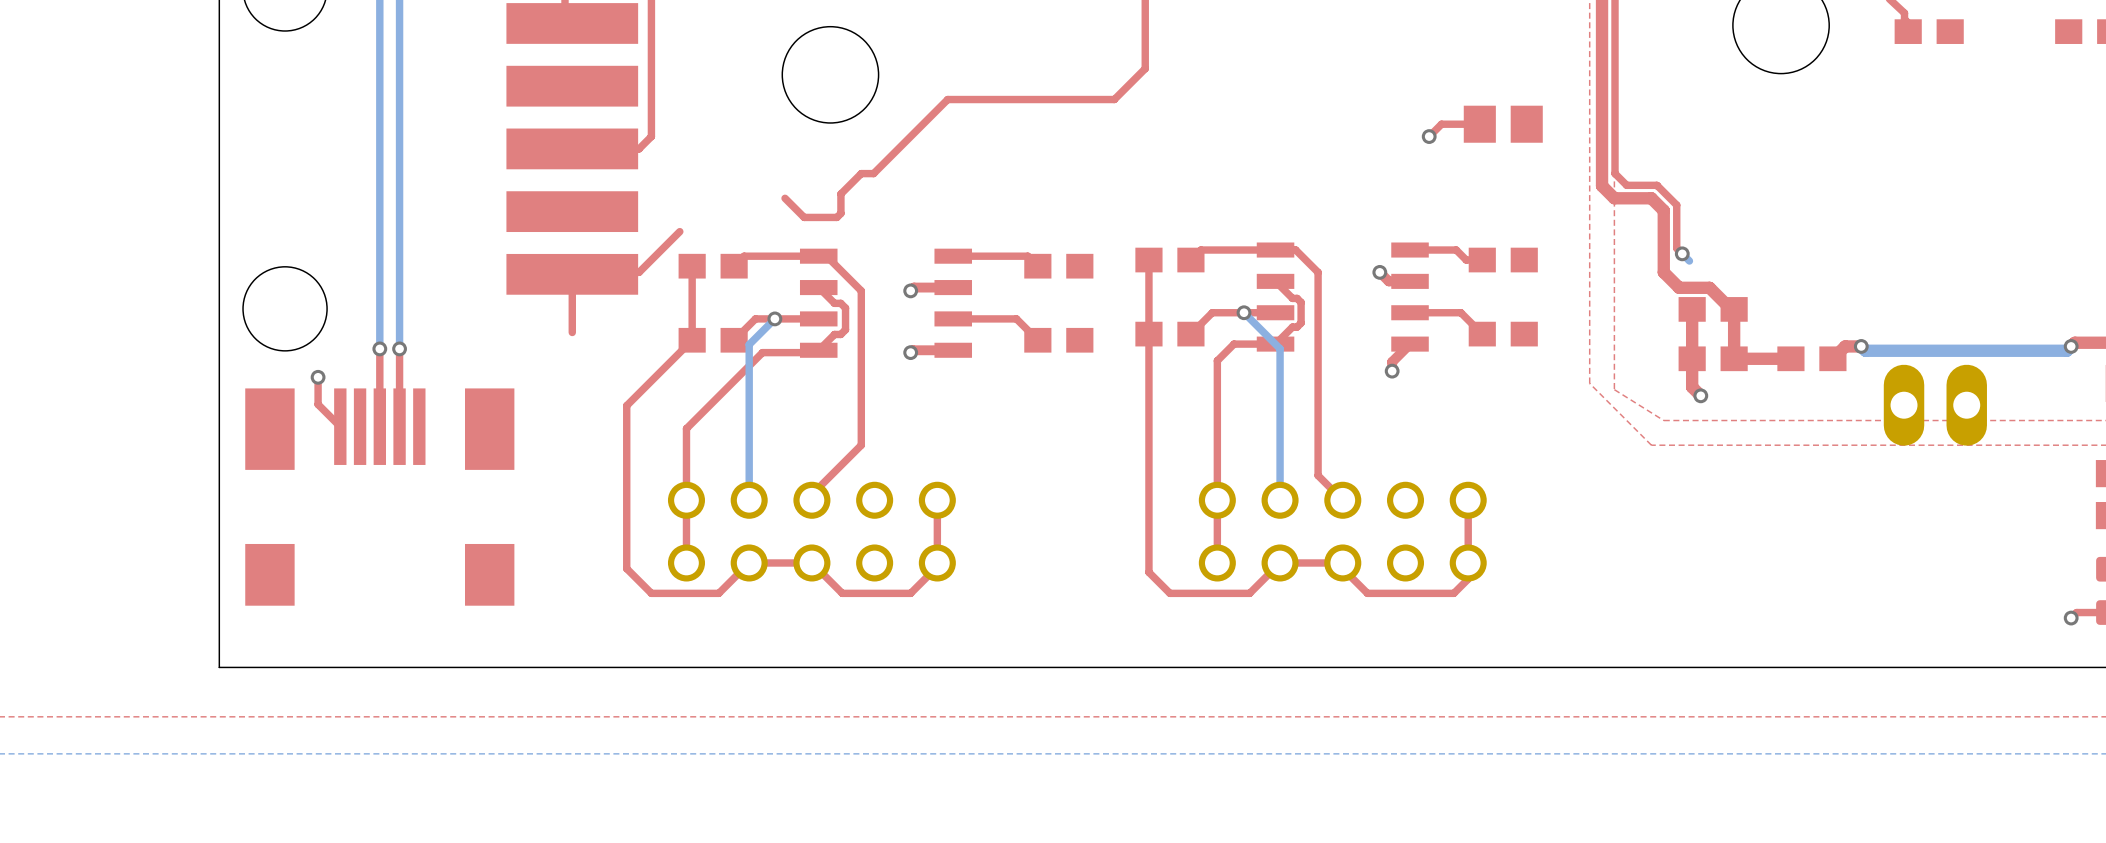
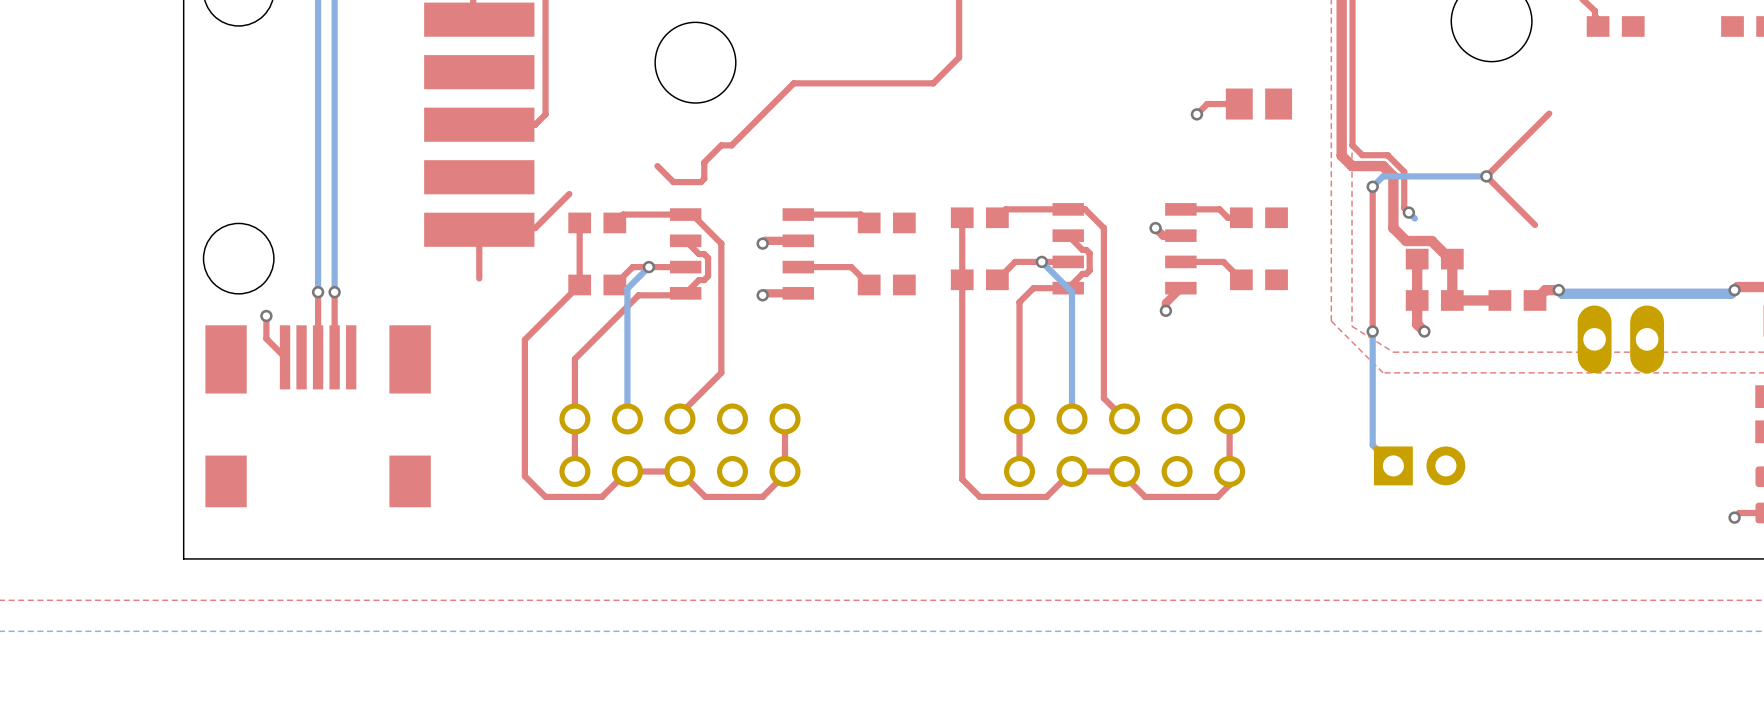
top track: none -> (1549, 113) (1486, 176) (1535, 225)
bottom track: none -> (1486, 176) (1383, 176) (1372, 186)
via: none -> (1486, 176)
top track: none -> (1372, 186) (1372, 331)
via: none -> (1372, 186)
bottom track: none -> (1372, 331) (1372, 445) (1393, 465)
via: none -> (1372, 331)
part: none -> (1419, 465)

